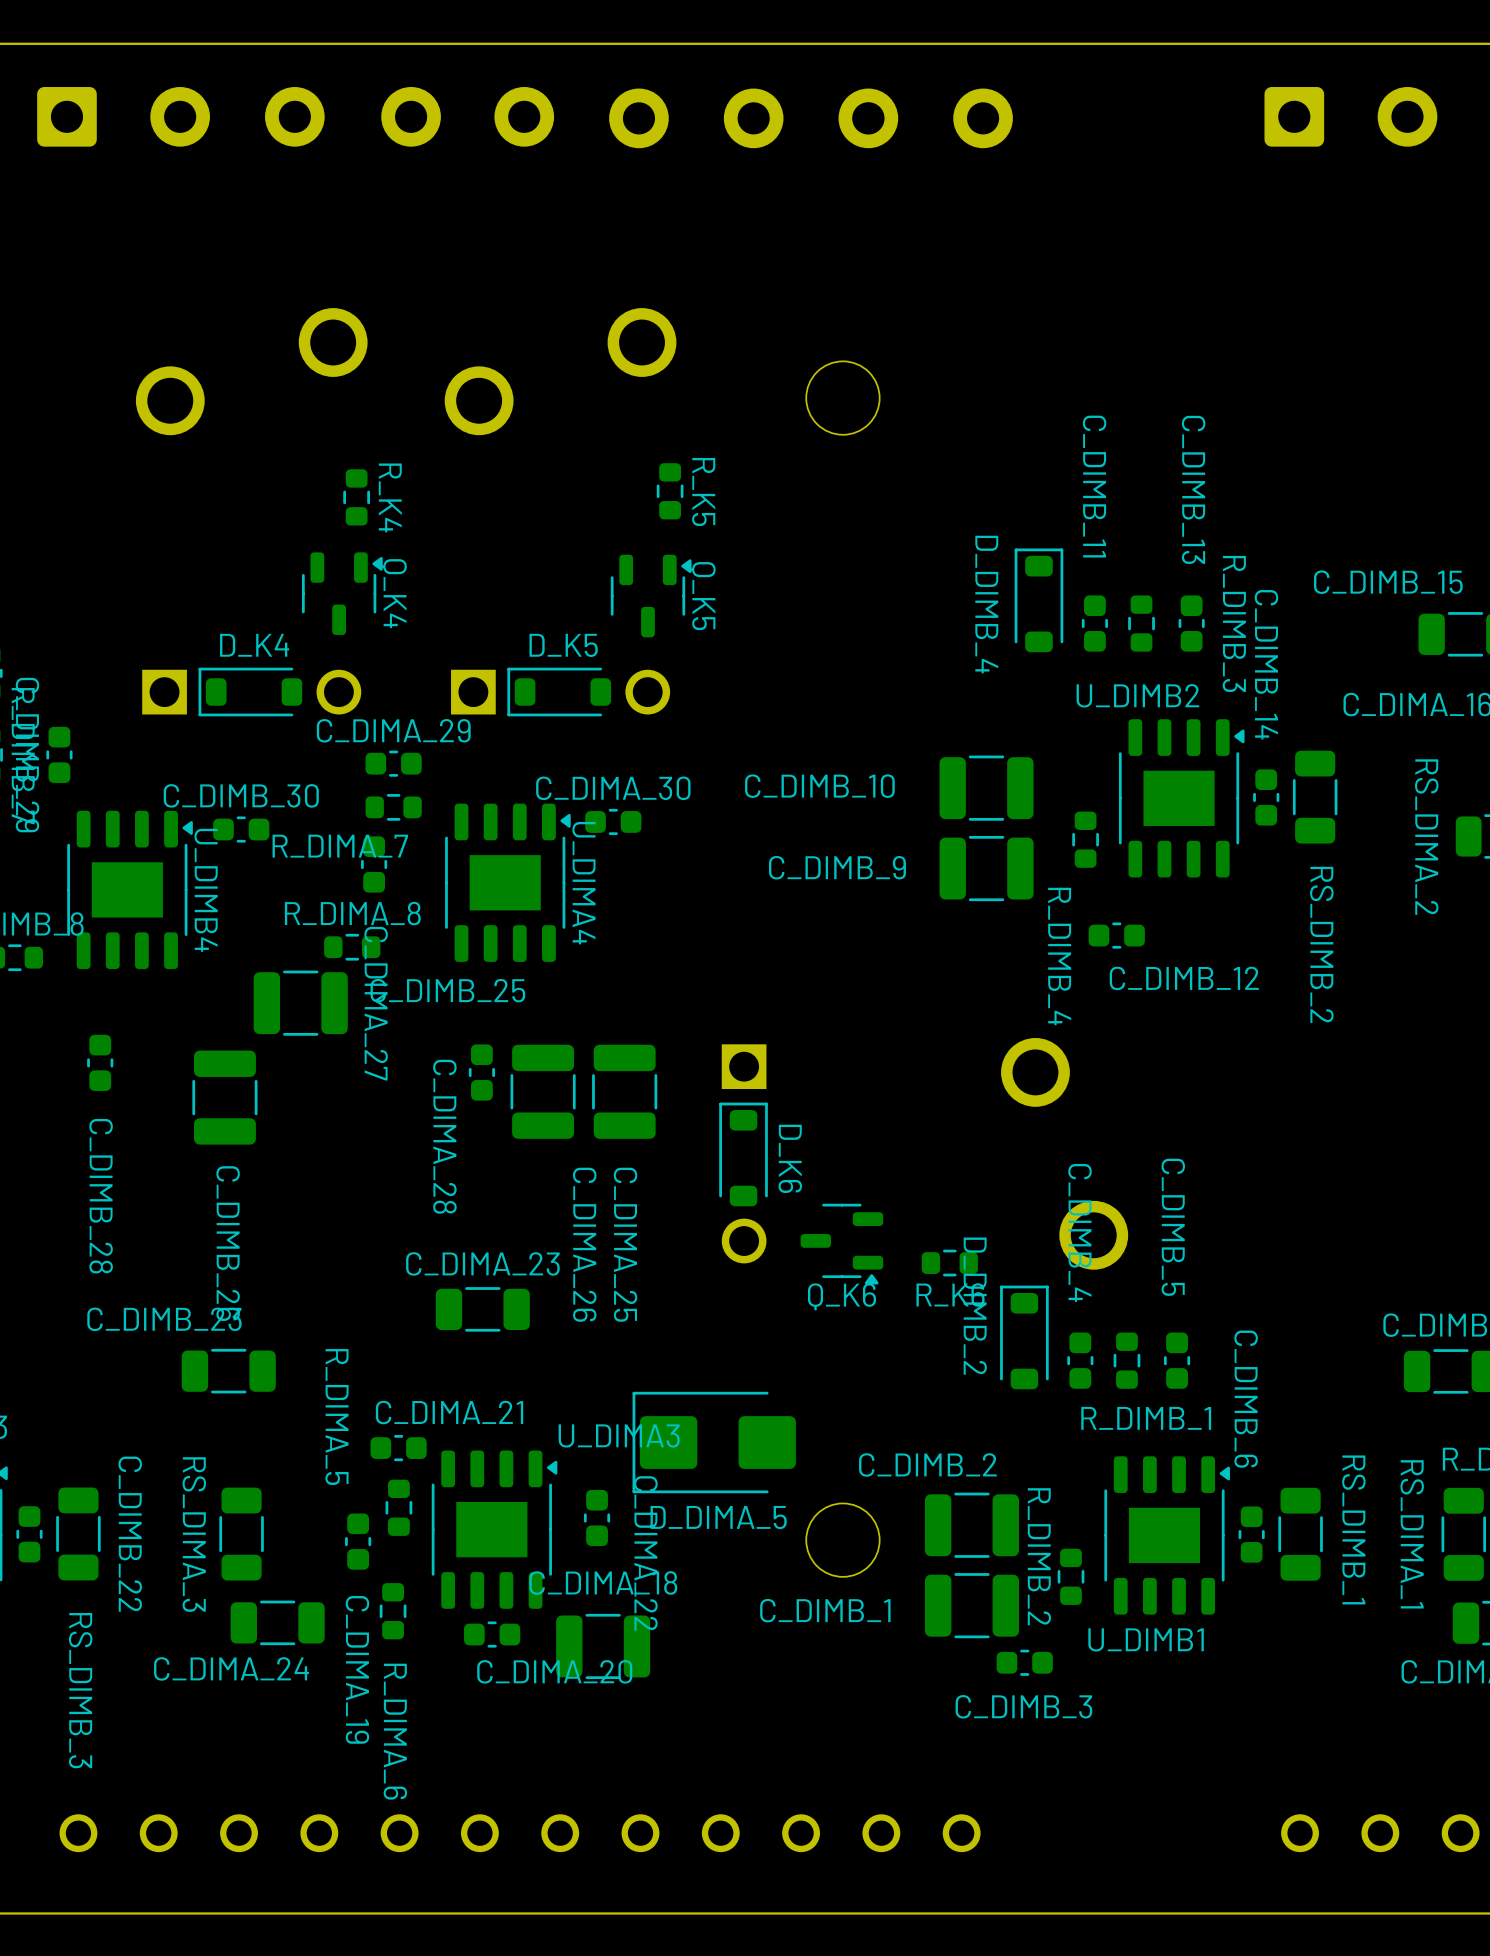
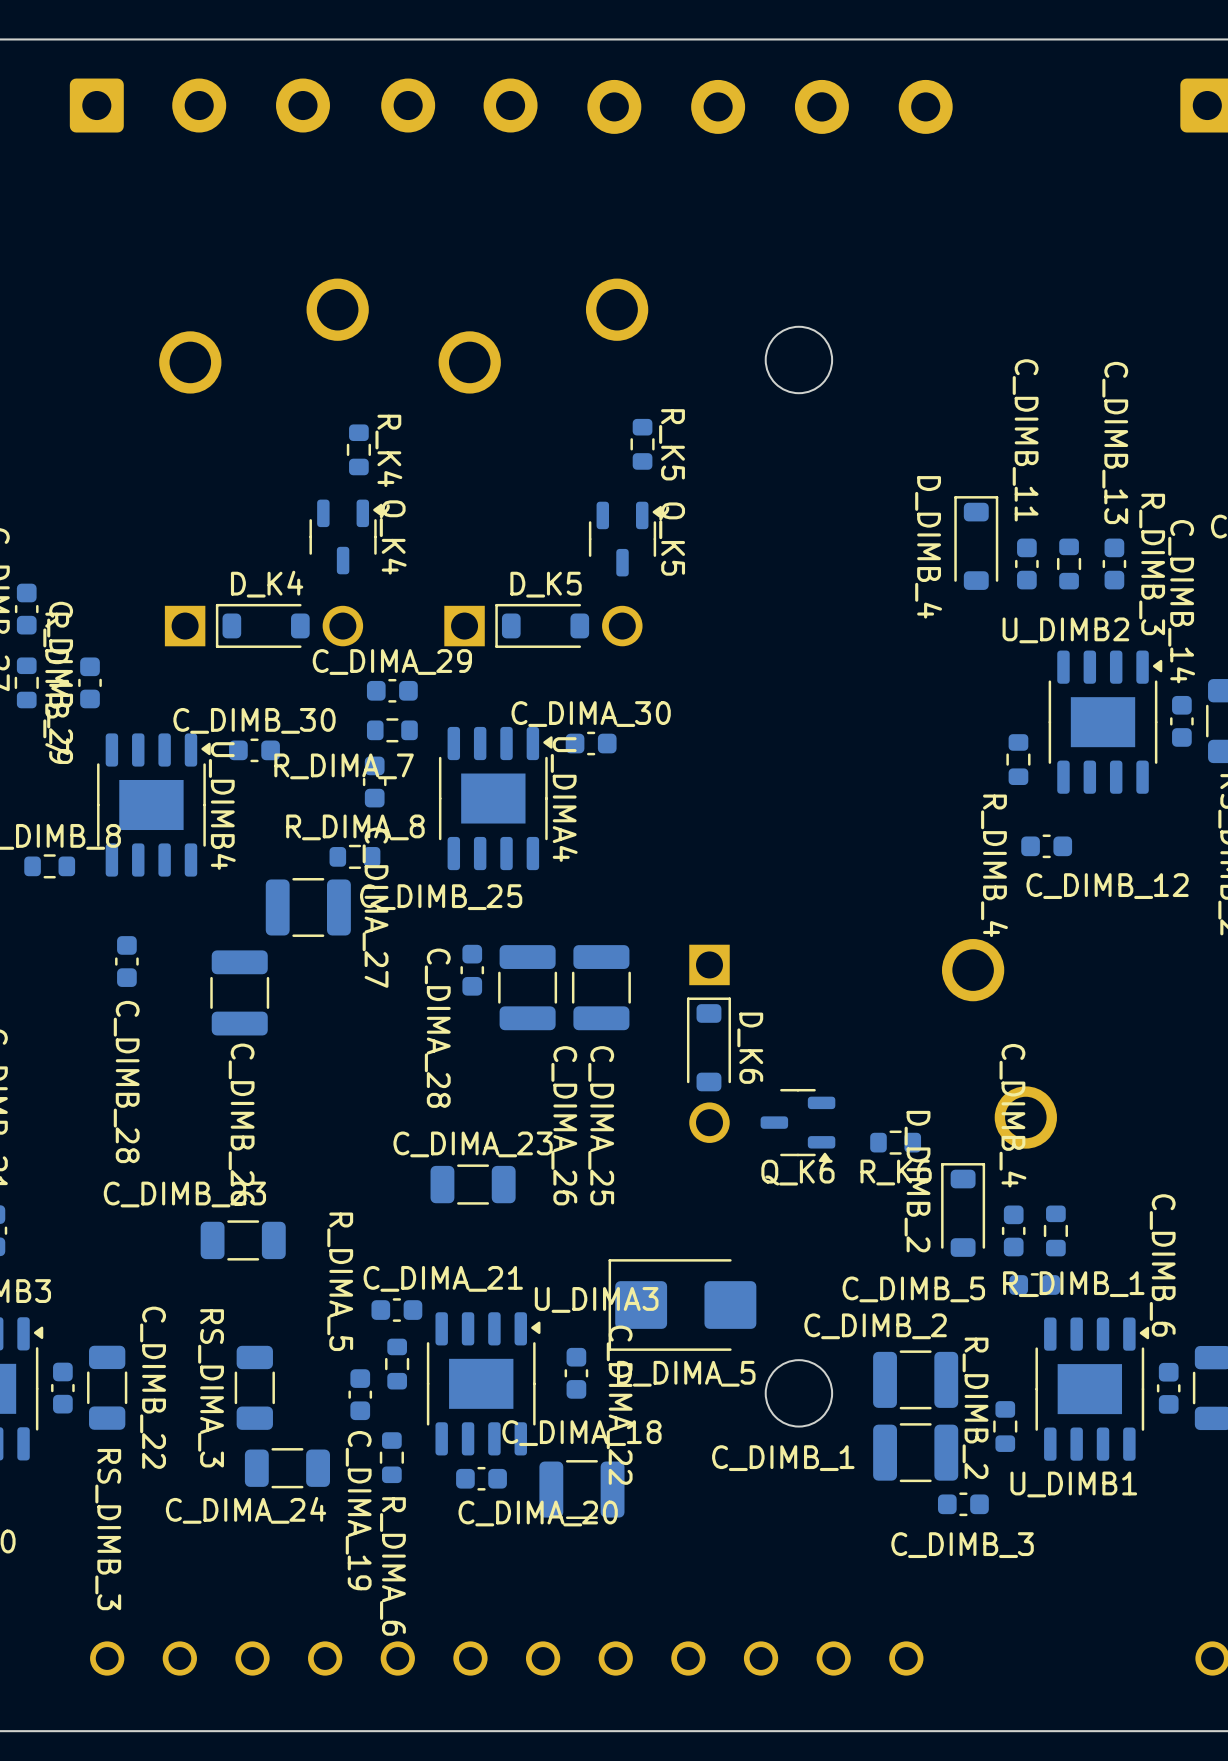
C_DIMB_10: (986, 788) -> none
C_DIMB_9: (986, 868) -> none
C_DIMB_5 name position: C_DIMB_5 (1173, 1227) -> C_DIMB_5 (913, 1289)
C_DIMB_5 rotation: 0° (1177, 1360) -> 90° clockwise (1034, 1284)
C_DIMB_5 position: (1177, 1360) -> (1034, 1284)

